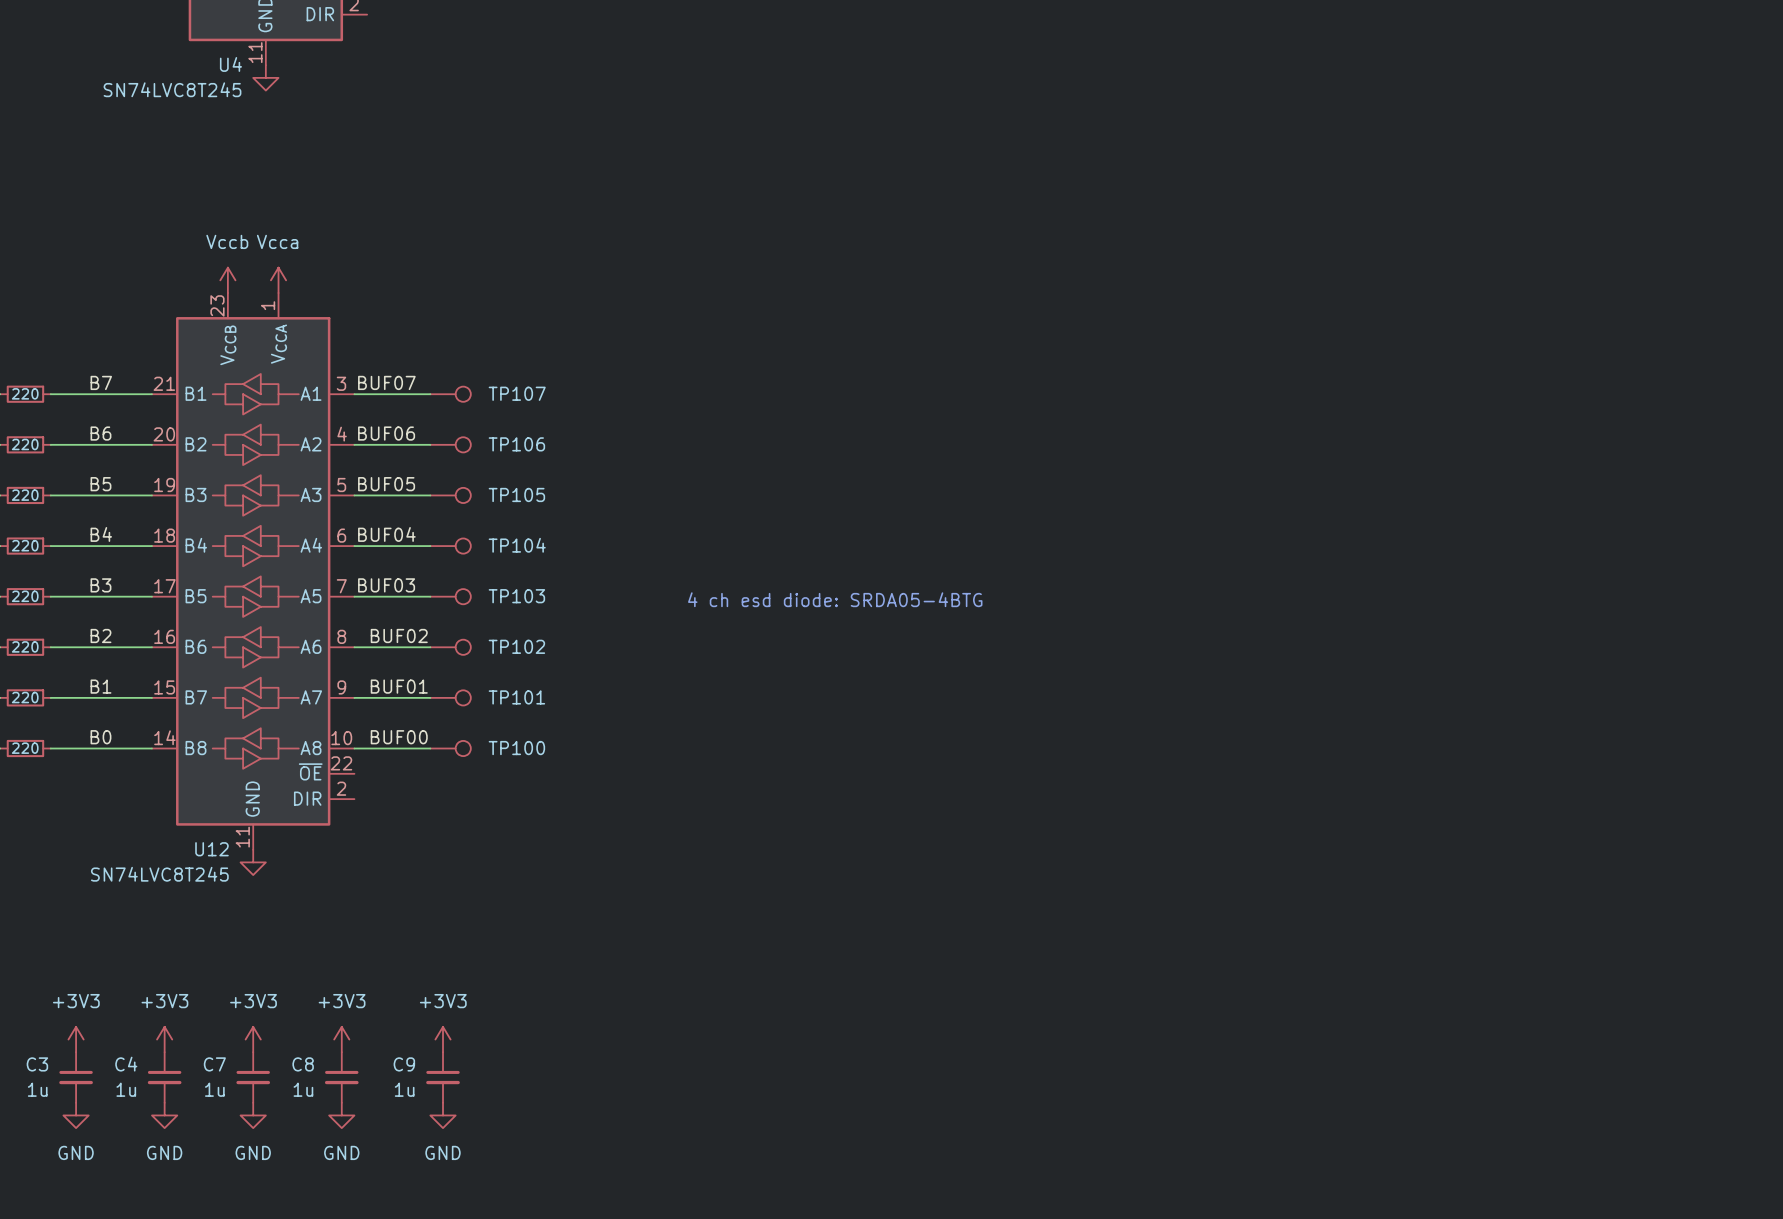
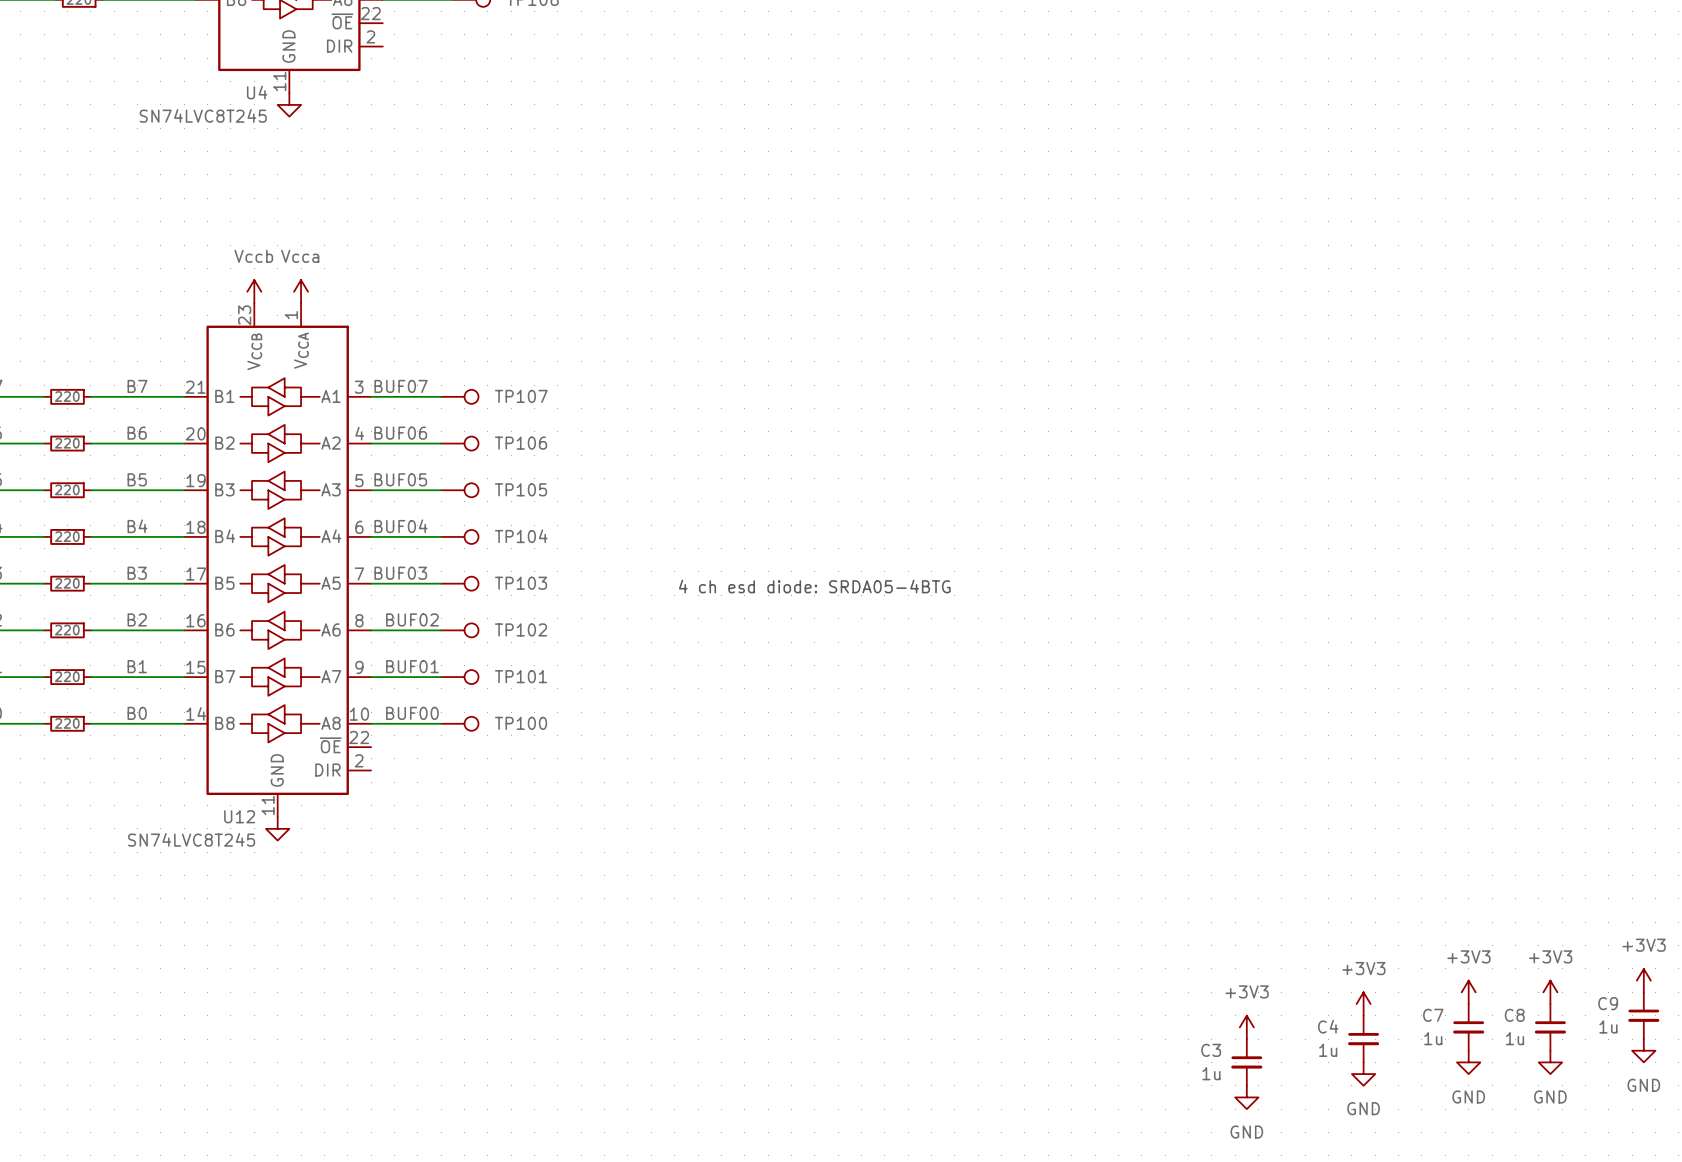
power symbol: none -> +3V3 (1643, 980)
power symbol: +3V3 (76, 1039) -> none
power symbol: +3V3 (164, 1039) -> none
power symbol: +3V3 (253, 1039) -> none
power symbol: +3V3 (341, 1039) -> none
power symbol: +3V3 (443, 1039) -> none
power symbol: none -> +3V3 (1468, 992)
power symbol: none -> +3V3 (1550, 992)
power symbol: none -> +3V3 (1363, 1004)
C3 position: (76, 1077) -> (1246, 1062)
C4 position: (164, 1077) -> (1363, 1039)
C7 position: (253, 1077) -> (1468, 1027)
C8 position: (341, 1077) -> (1550, 1027)
C9 position: (443, 1077) -> (1643, 1015)
power symbol: none -> +3V3 (1246, 1027)
power symbol: none -> GND (1643, 1050)
power symbol: GND (76, 1115) -> none
power symbol: GND (164, 1115) -> none
power symbol: GND (253, 1115) -> none
power symbol: GND (341, 1115) -> none
power symbol: GND (443, 1115) -> none
power symbol: none -> GND (1468, 1062)
power symbol: none -> GND (1550, 1062)
power symbol: none -> GND (1363, 1074)
power symbol: none -> GND (1246, 1097)

